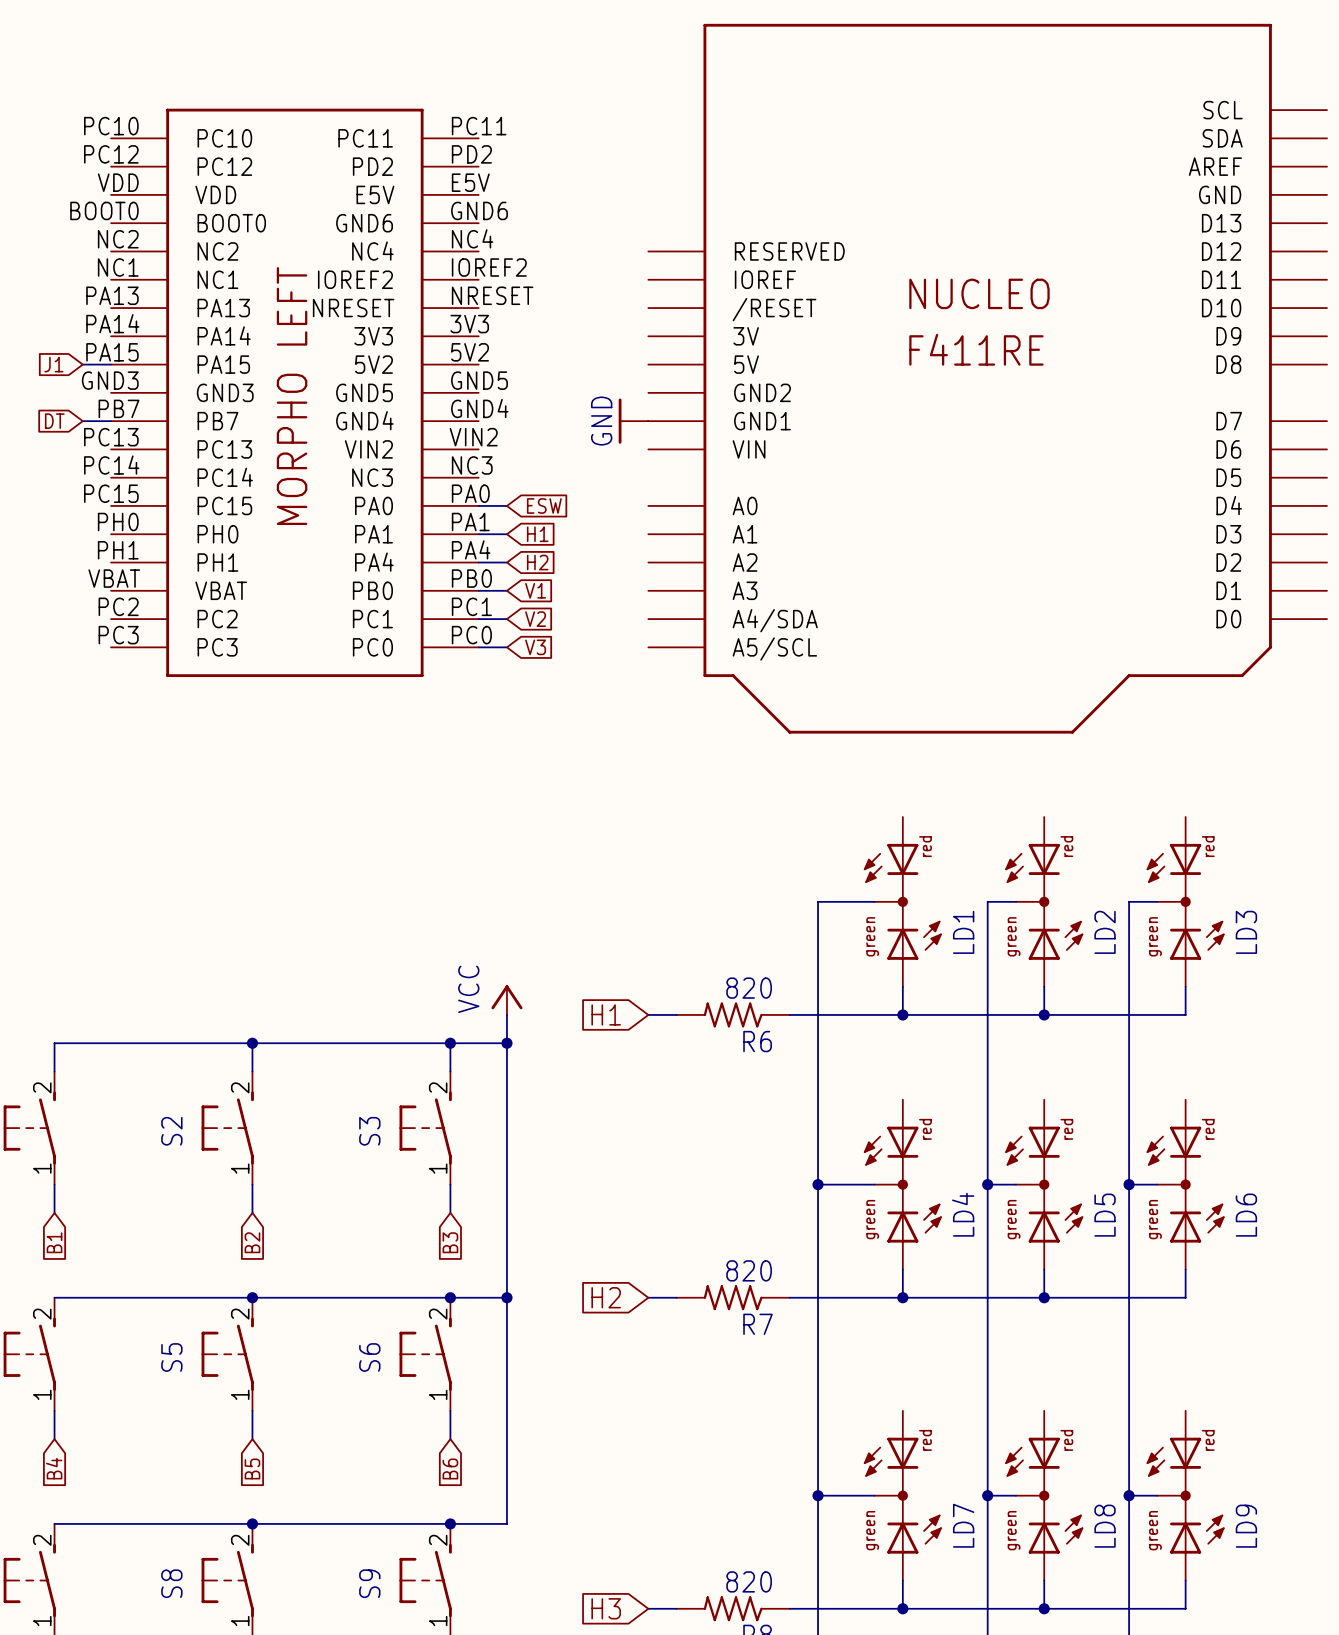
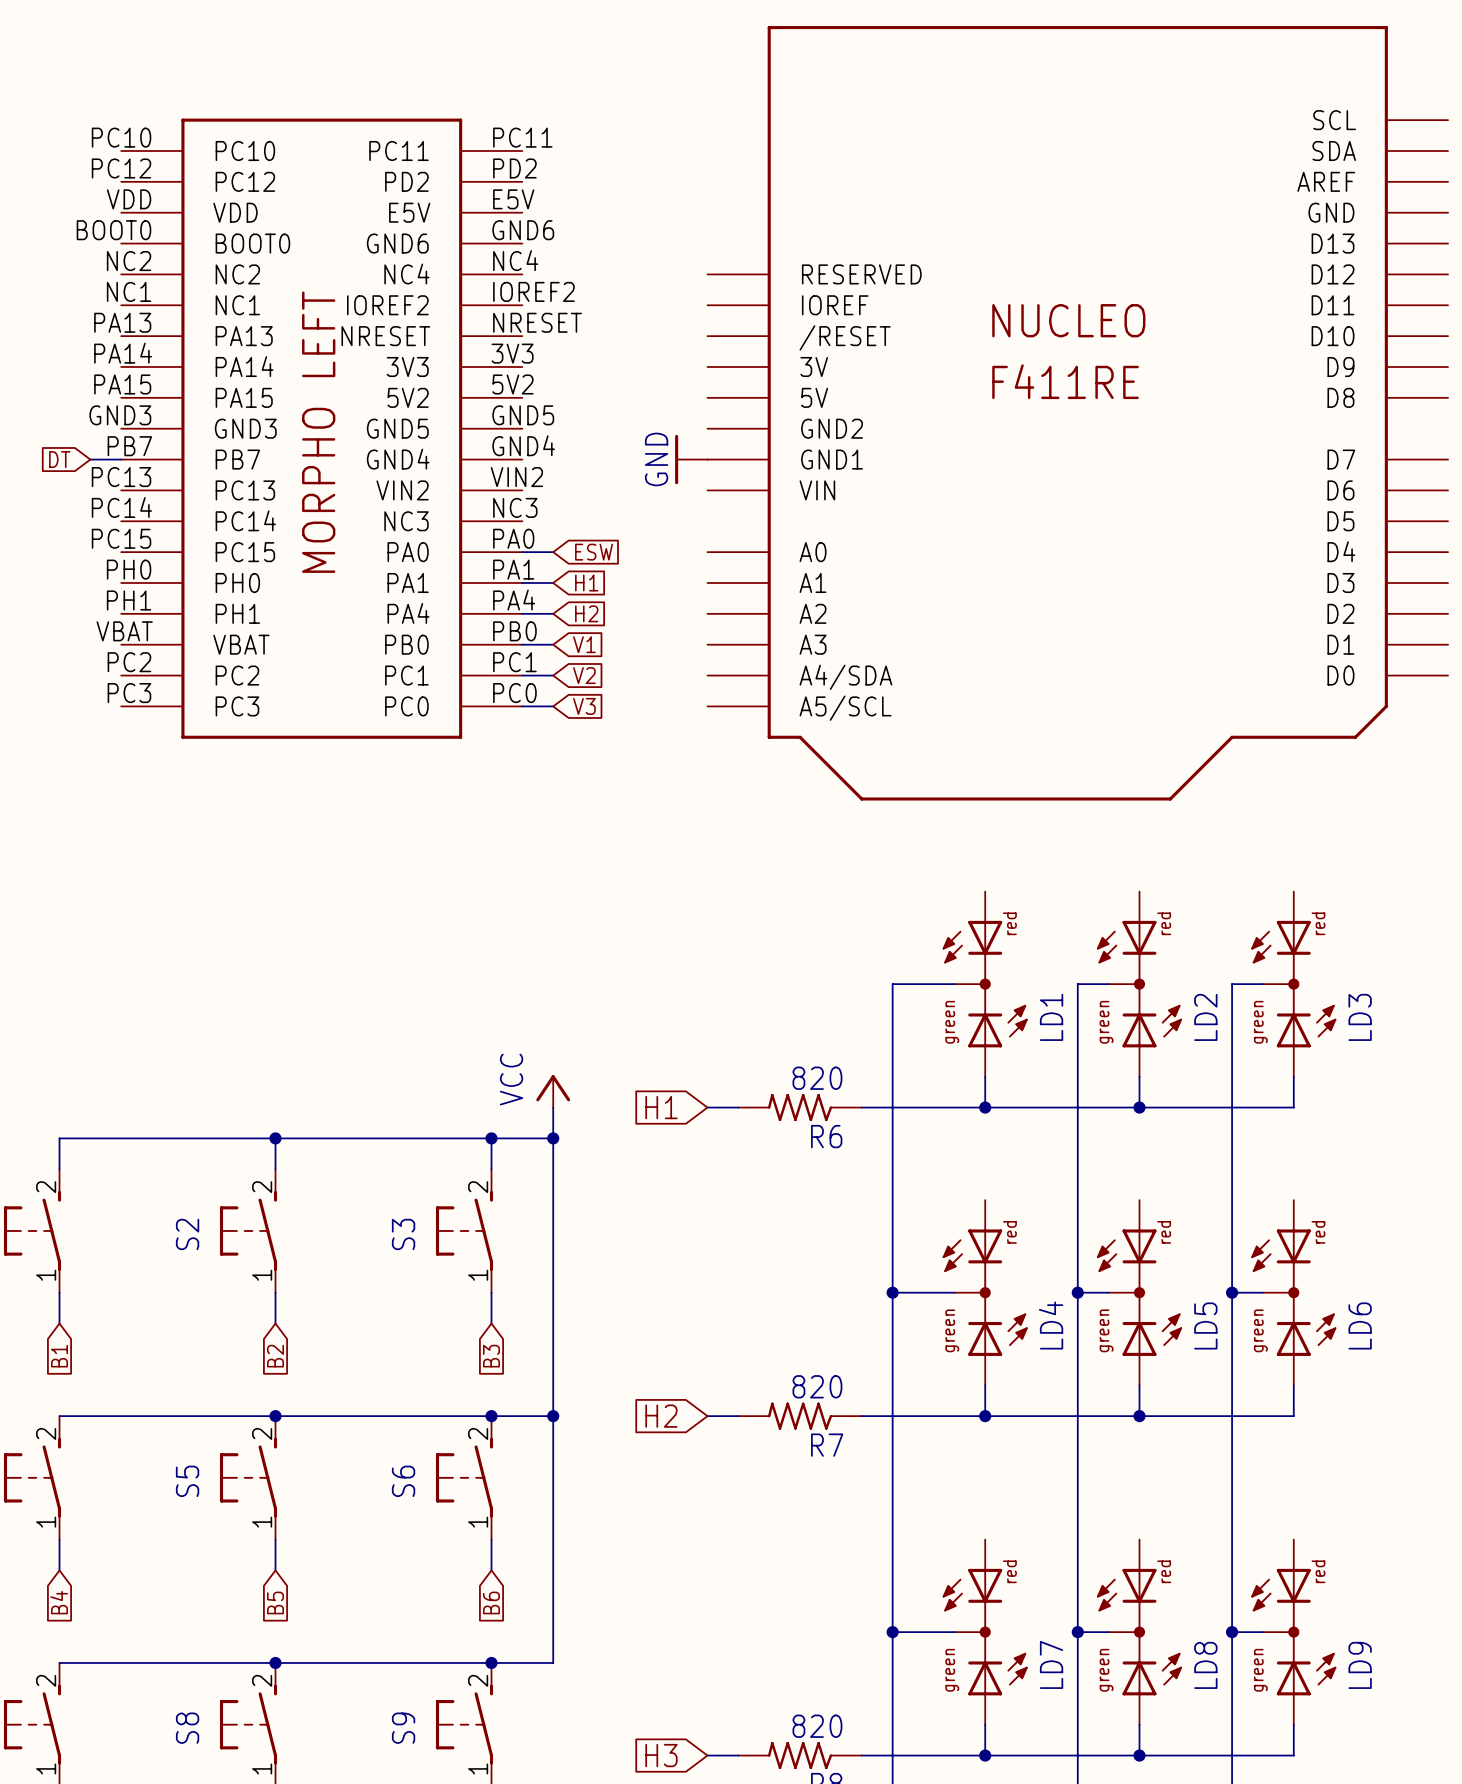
global label: J1 (53, 364) -> none
wire: (82, 364) (111, 364) -> none

